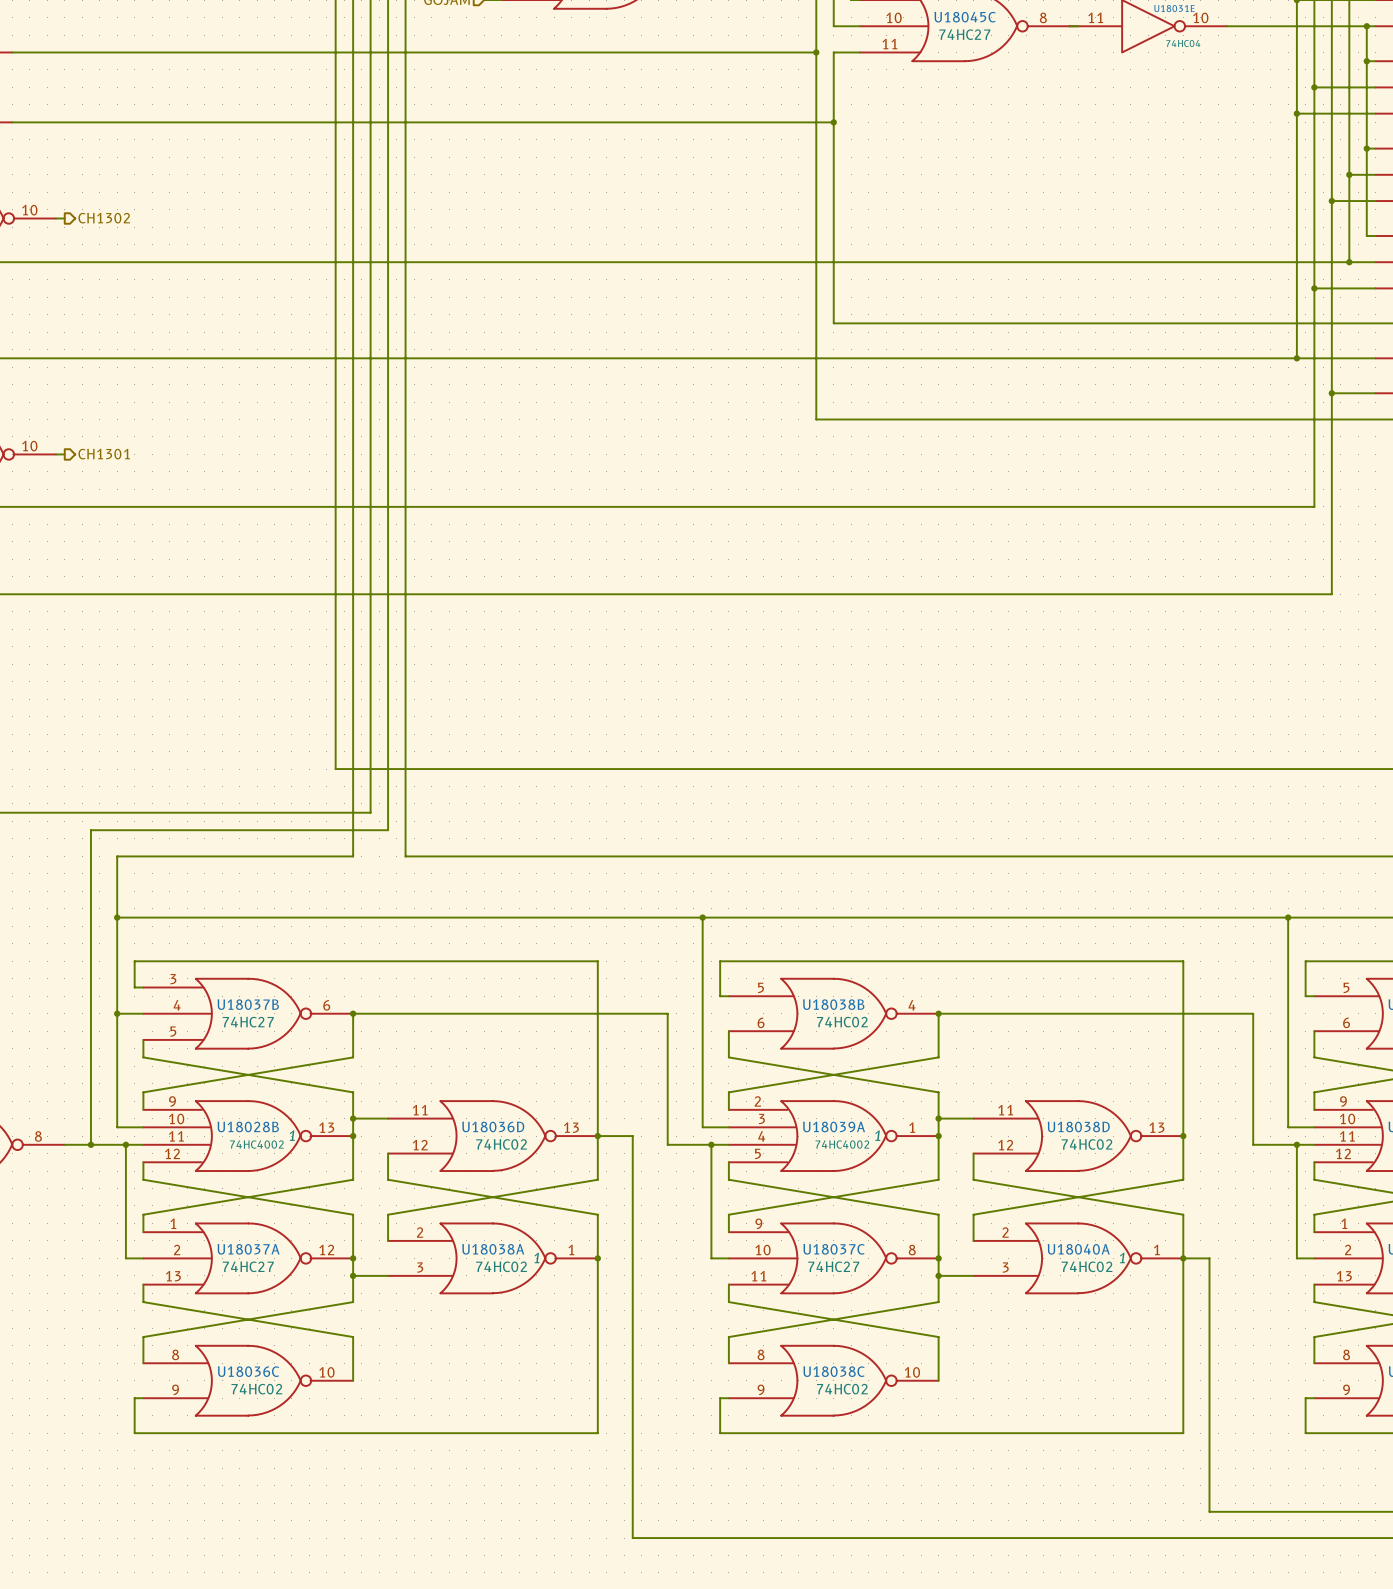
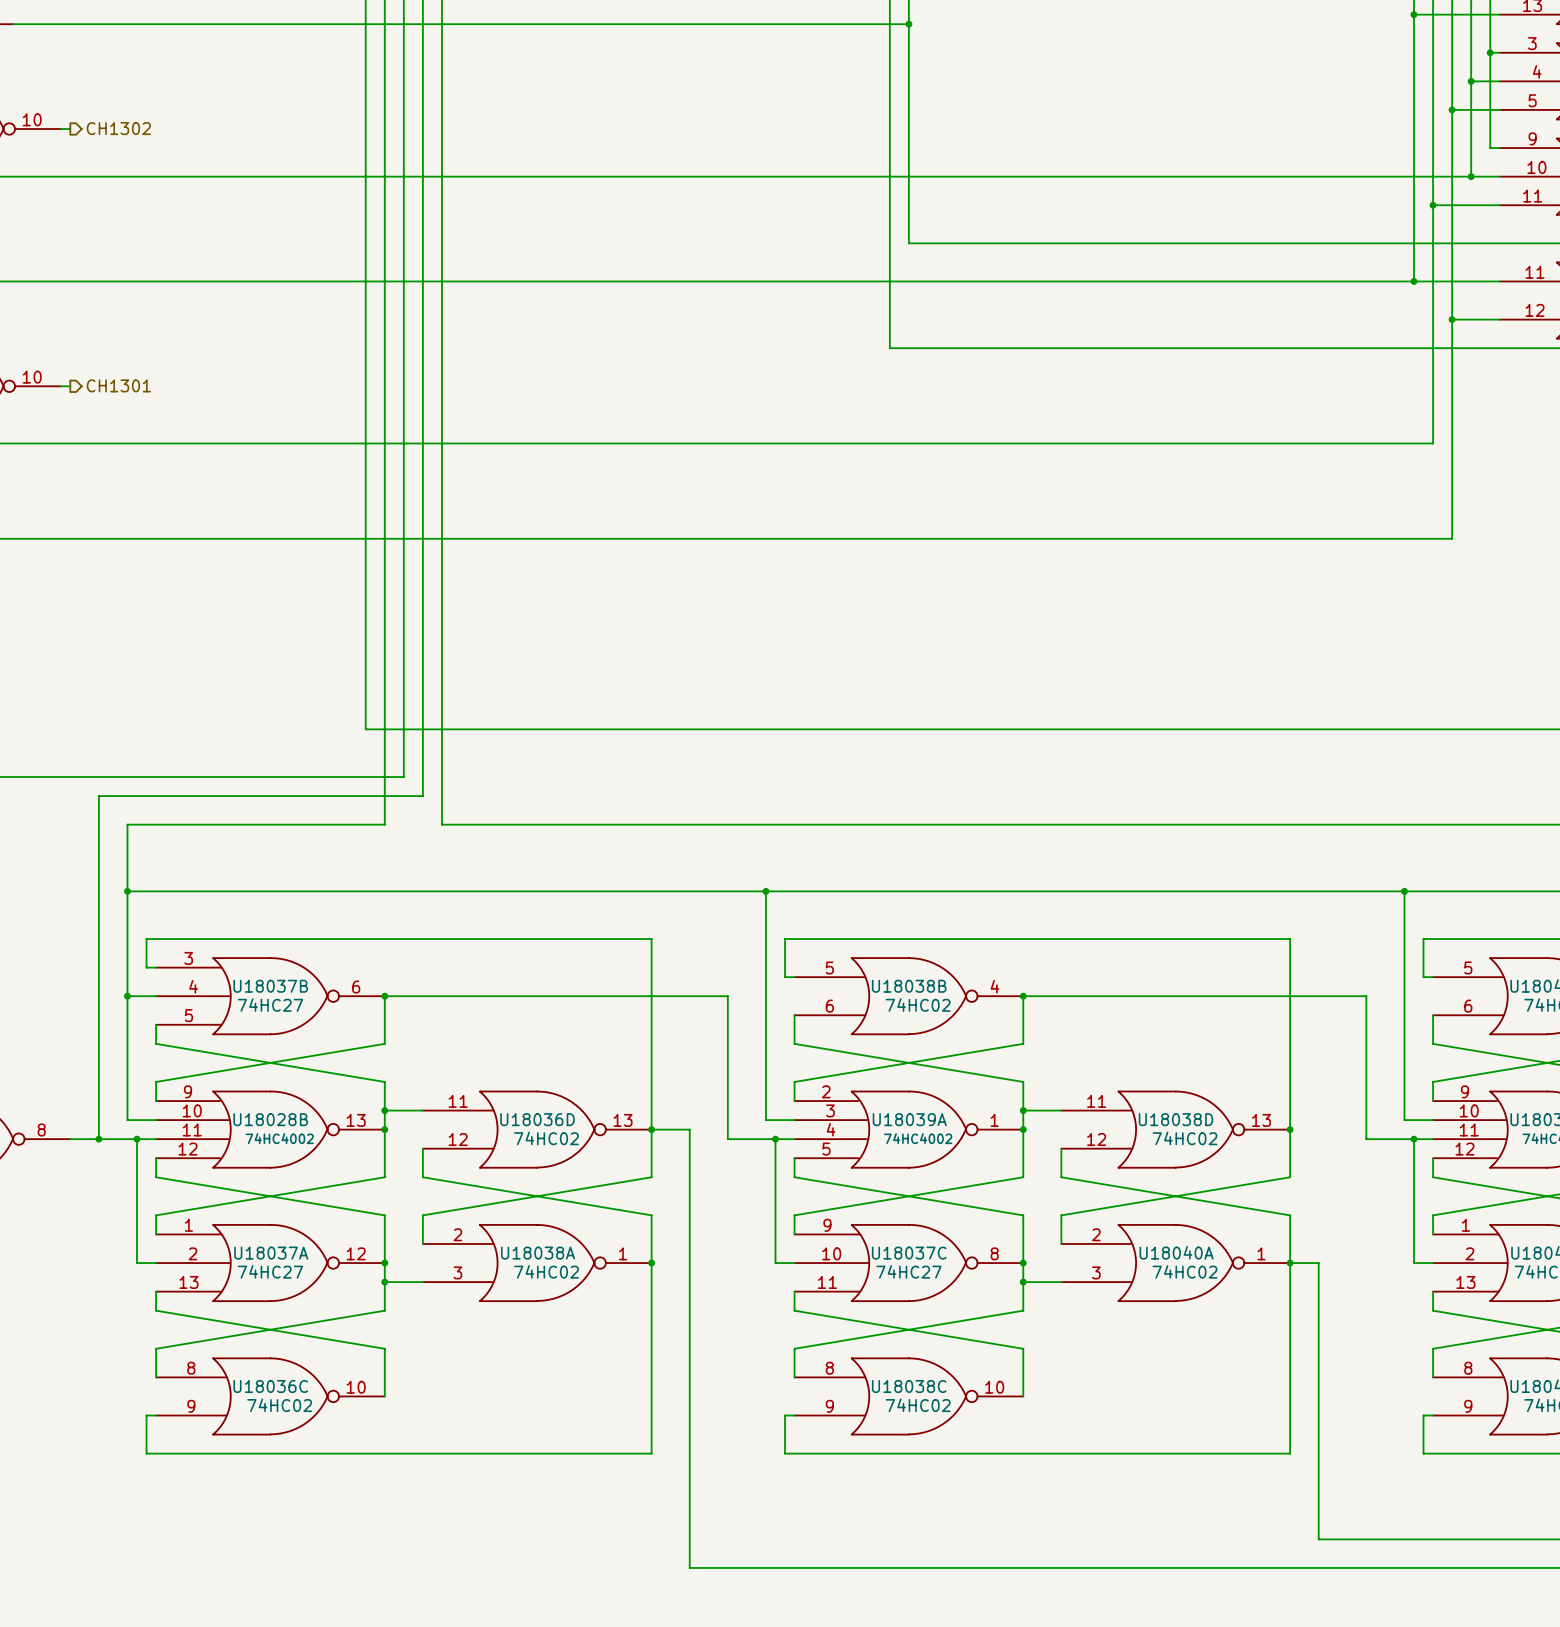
U18028B text: 1 (292, 1135) -> none
U18039A text: 1 (877, 1135) -> none
U18038A text: 1 (536, 1258) -> none
U18040A text: 1 (1122, 1258) -> none

